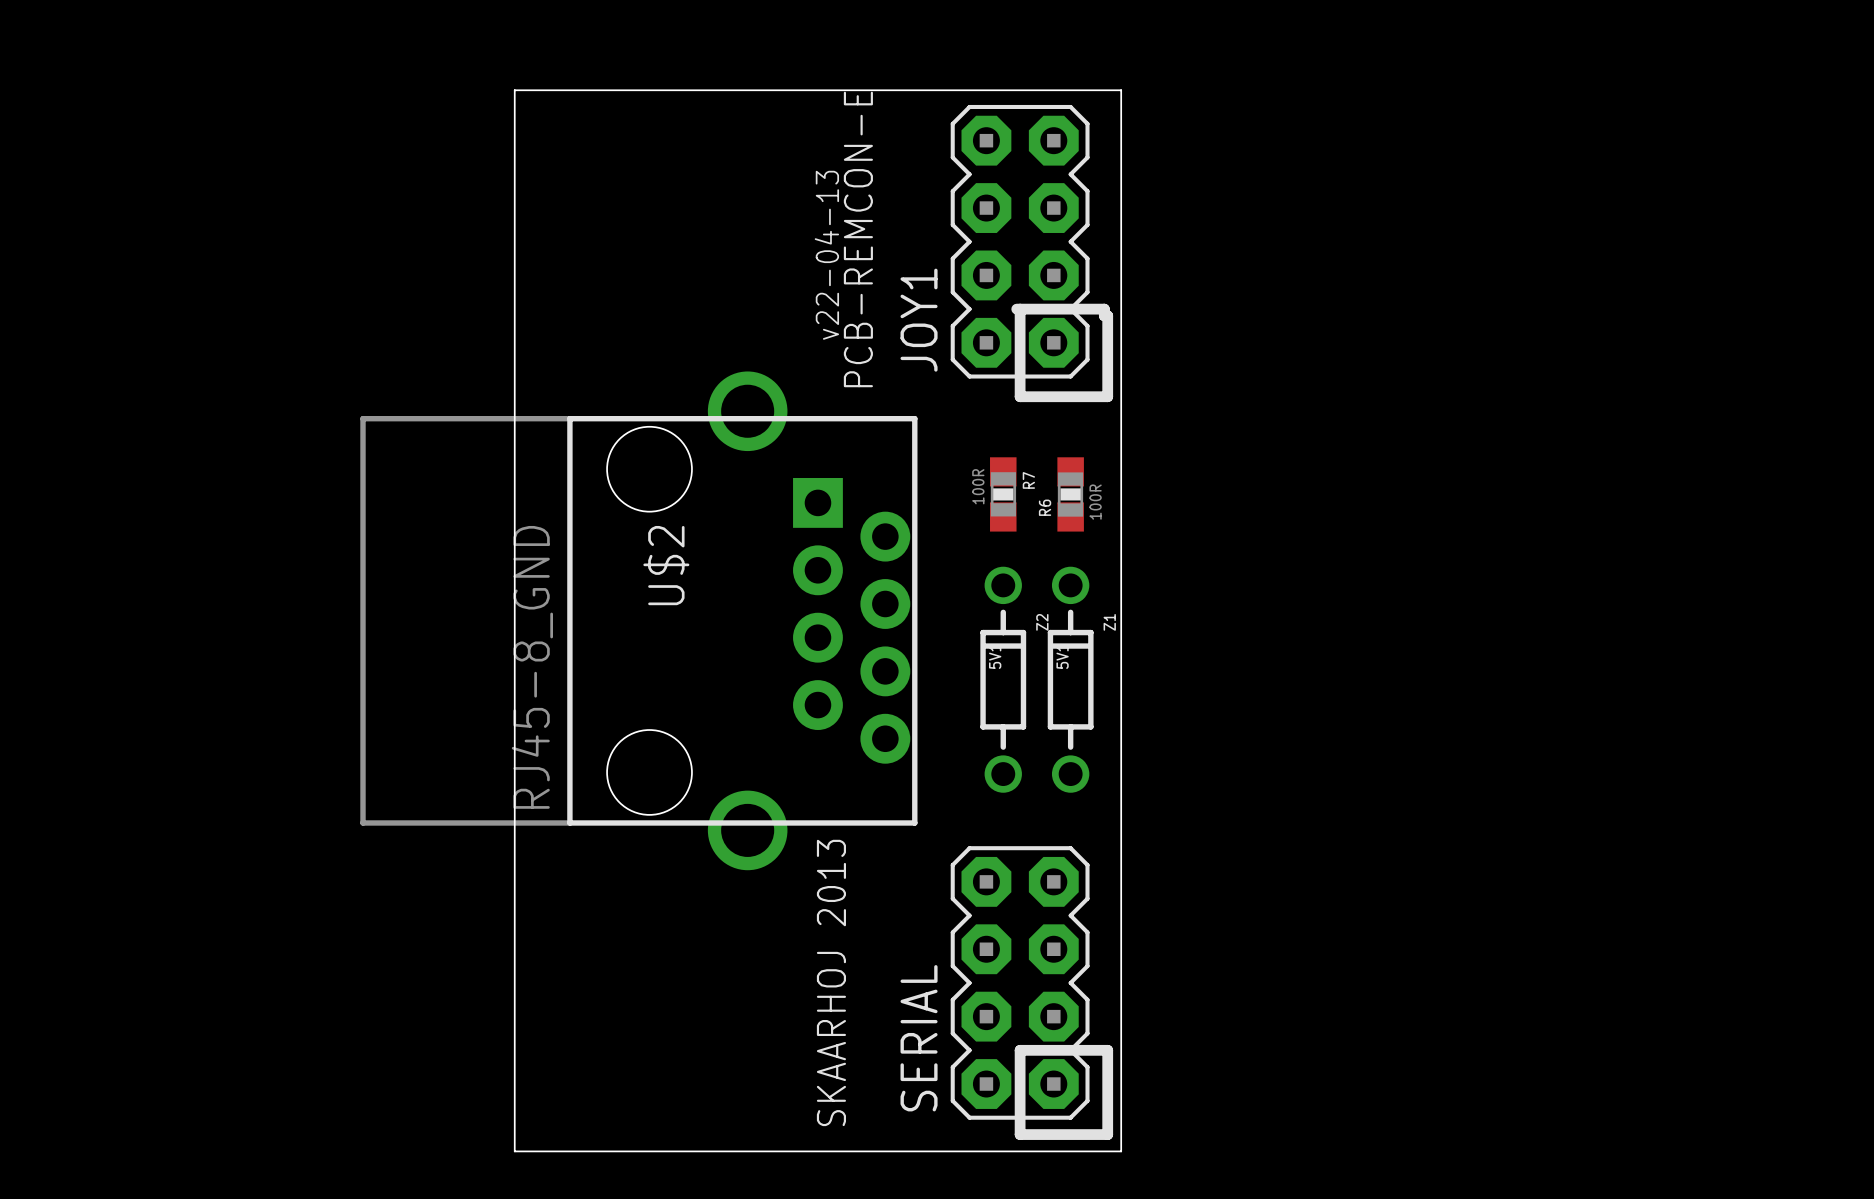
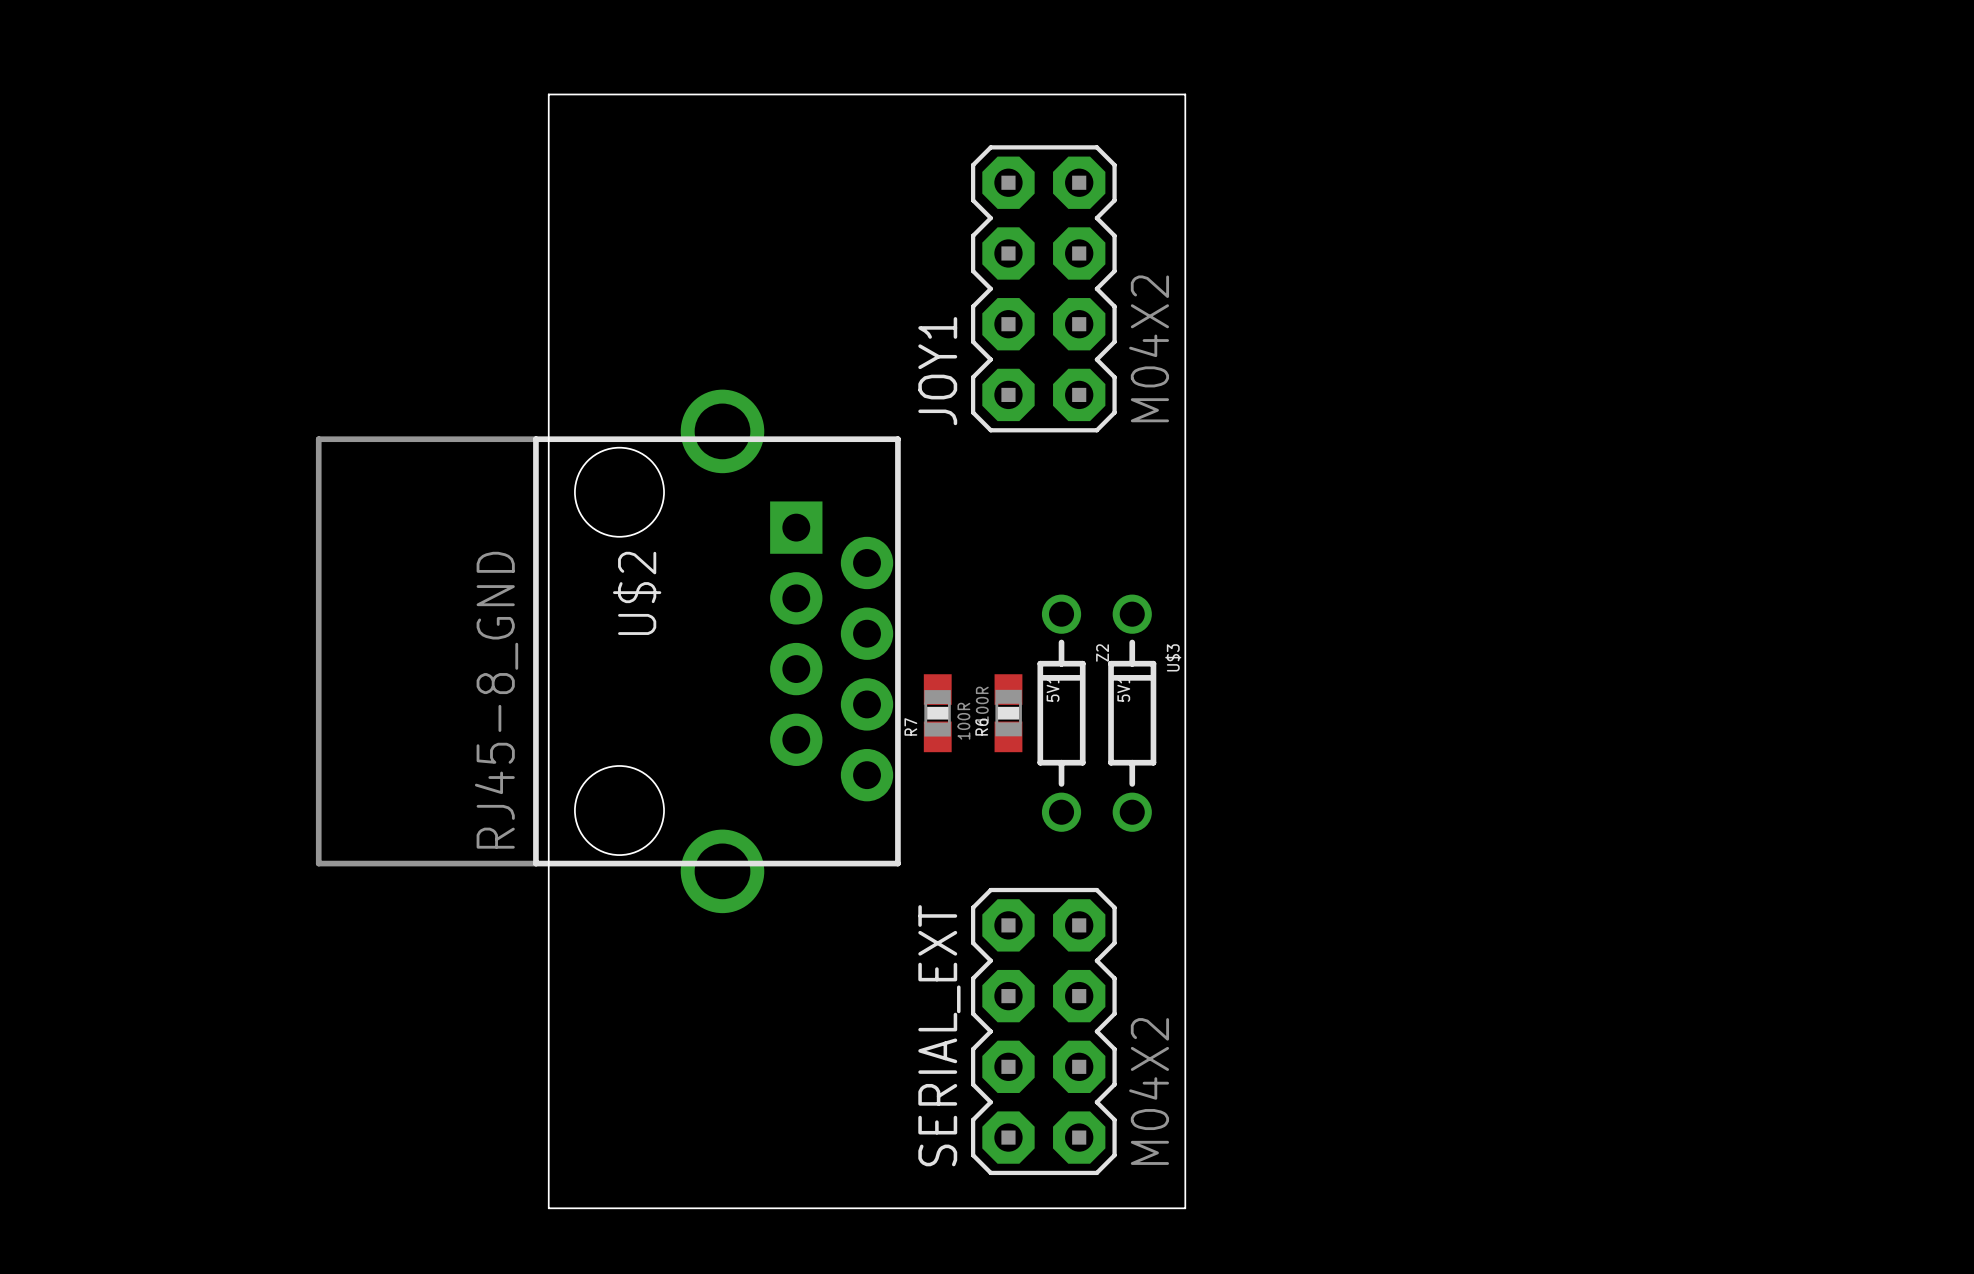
text: PCB-REMCON-E (858, 239) -> none
JOY1 position: (1020, 241) -> (1043, 288)
text: v22-04-13 (826, 255) -> none
line: (1016, 309) (1104, 309) (1104, 315) (1107, 315) (1107, 396) (1020, 396) (1020, 309) -> none
JOY1 value: none -> M04X2 (1149, 348)
R7 name position: R7 (1028, 480) -> R7 (910, 726)
R7 value position: 100R (978, 486) -> 100R (963, 721)
R7 position: (1003, 494) -> (937, 713)
R6 position: (1070, 494) -> (1008, 713)
R6 value position: 100R (1095, 502) -> 100R (982, 705)
U$2 position: (638, 620) -> (608, 651)
Z1 name: Z1 (1109, 622) -> U$3 (1173, 657)
text: SKAARHOJ 2013 (831, 982) -> none
SERIAL_EXT: none -> M04X2 (1043, 1031)
SERIAL: (1020, 982) -> none
line: (1020, 1050) (1020, 1134) (1107, 1134) (1107, 1050) (1020, 1050) -> none

